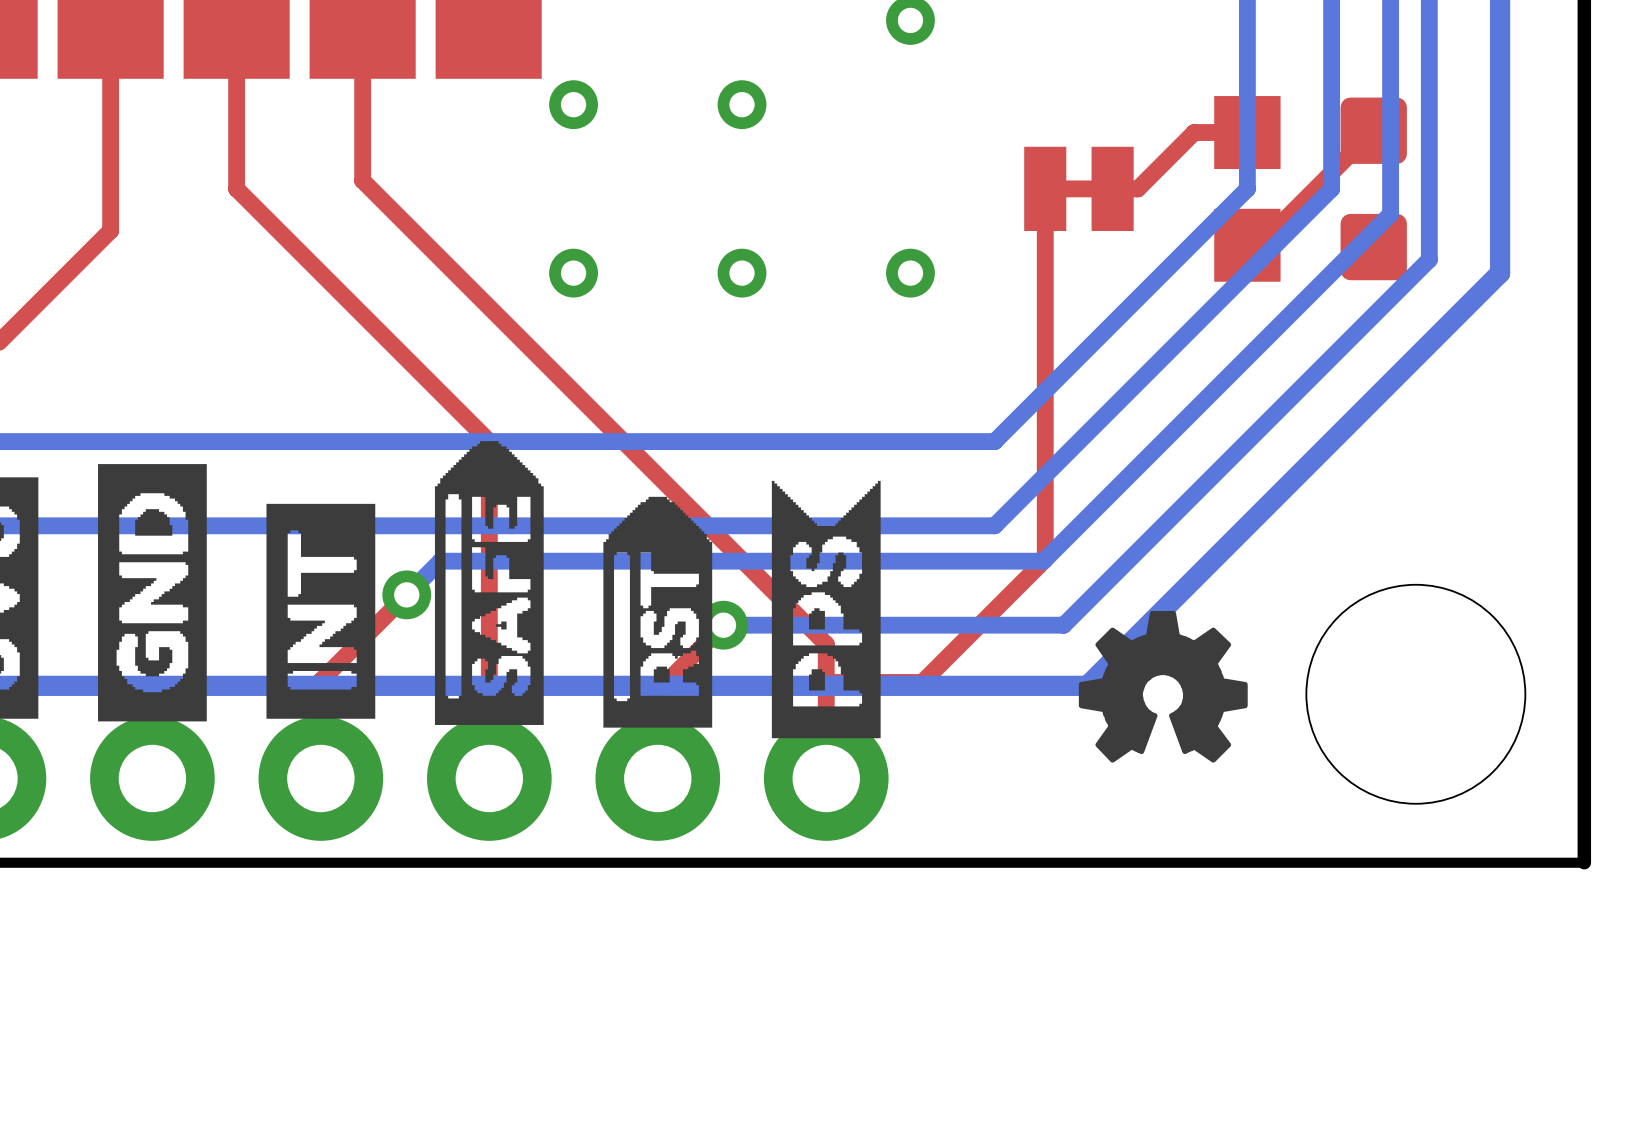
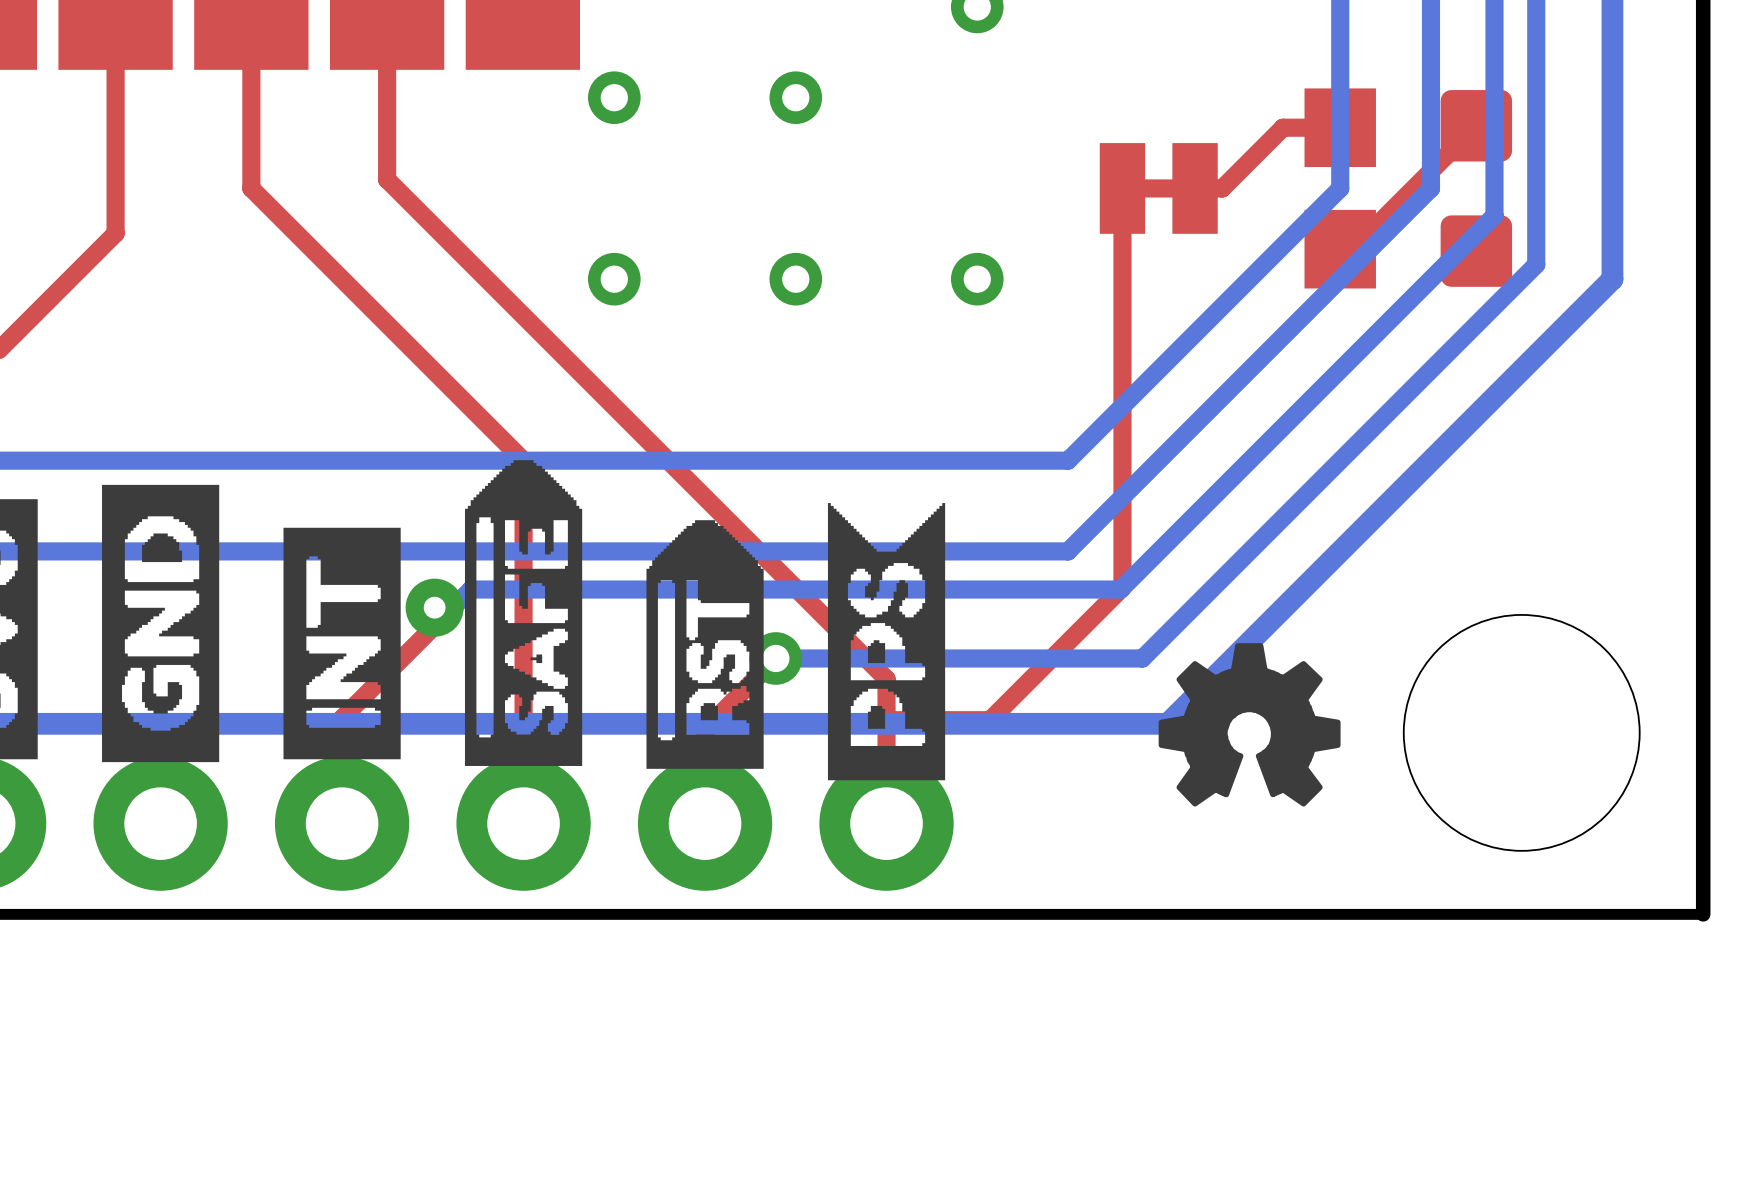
via position: (406, 594) -> (434, 607)

